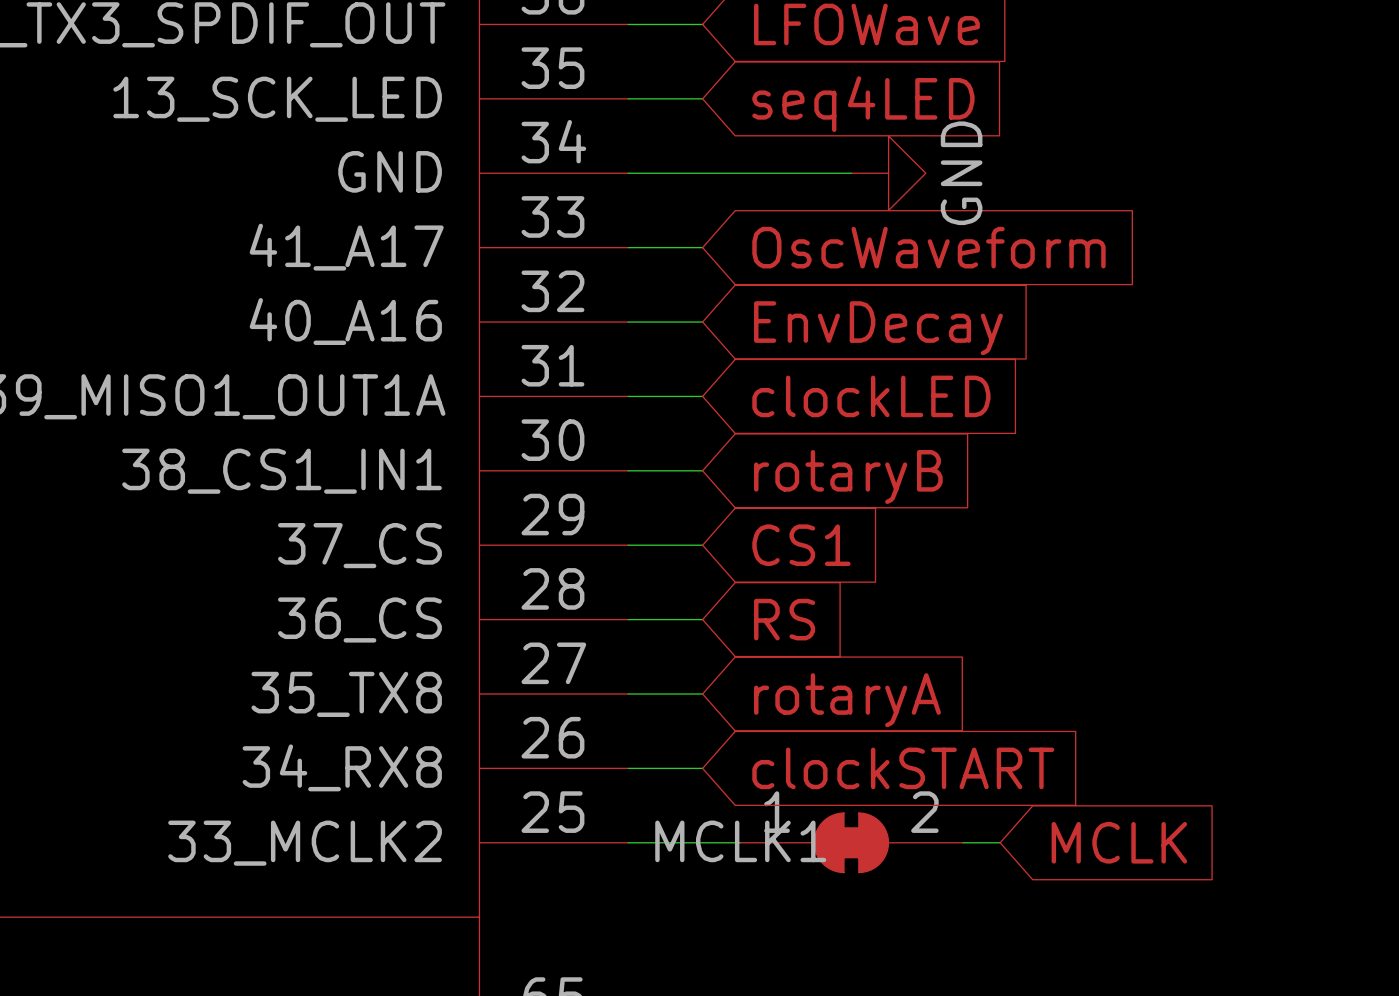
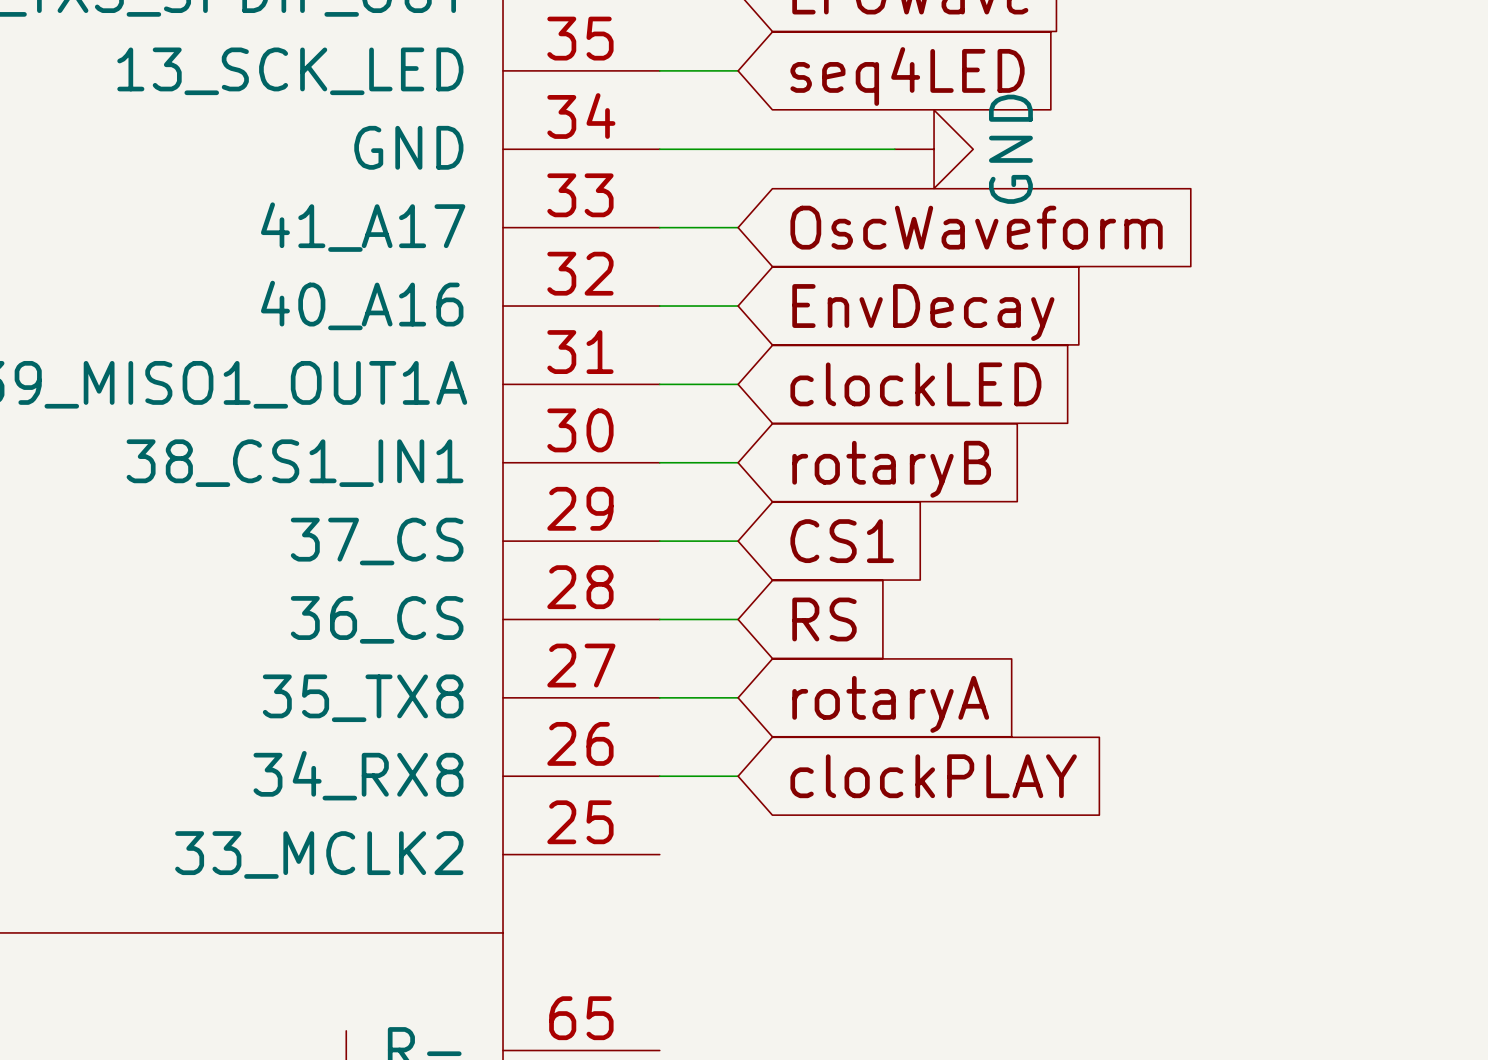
global label: clockSTART (903, 768) -> clockPLAY (933, 776)
wire: (628, 842) (739, 842) -> none
MCLK1: (851, 842) -> none
wire: (963, 842) (1000, 842) -> none
global label: MCLK (1119, 842) -> none

